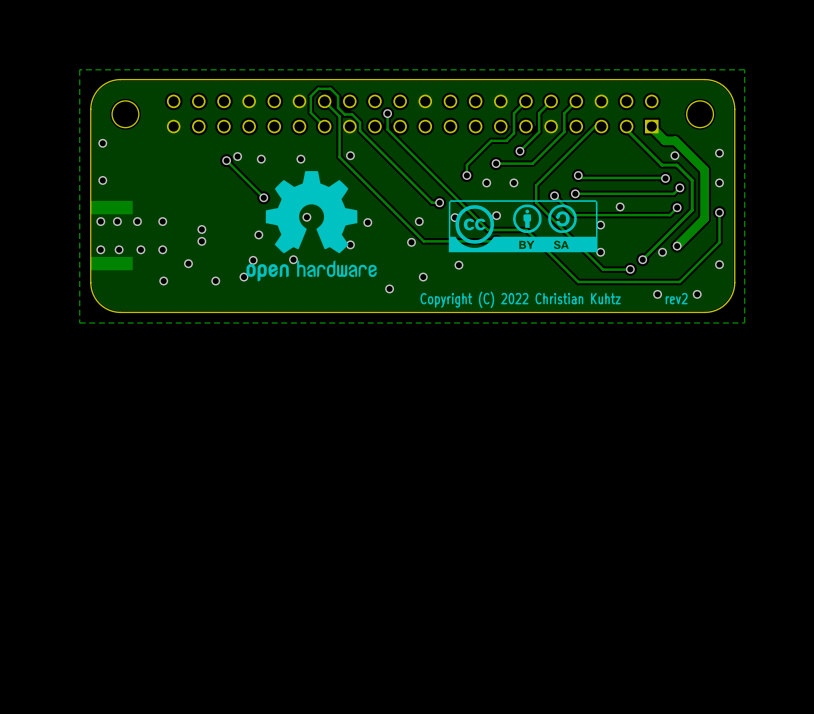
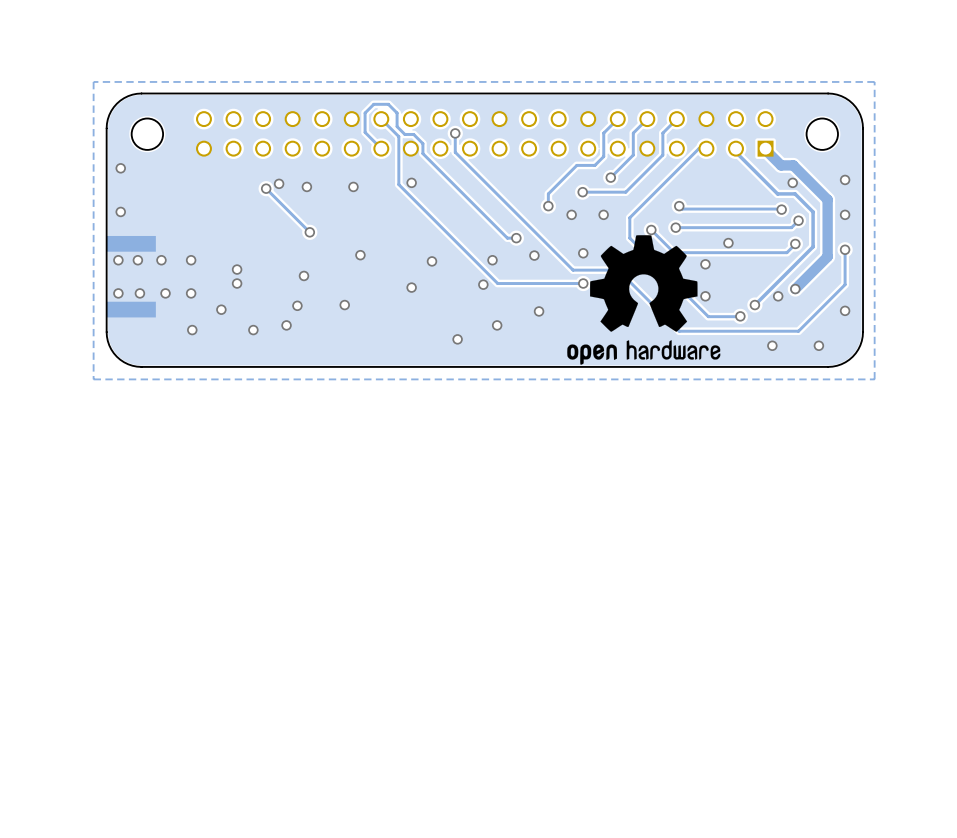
drawing: [448, 200, 598, 253] -> none
drawing position: (311, 226) -> (643, 299)
text: rev2 (676, 298) -> none
text: Copyright (C) 2022 Christian Kuhtz (520, 299) -> none

